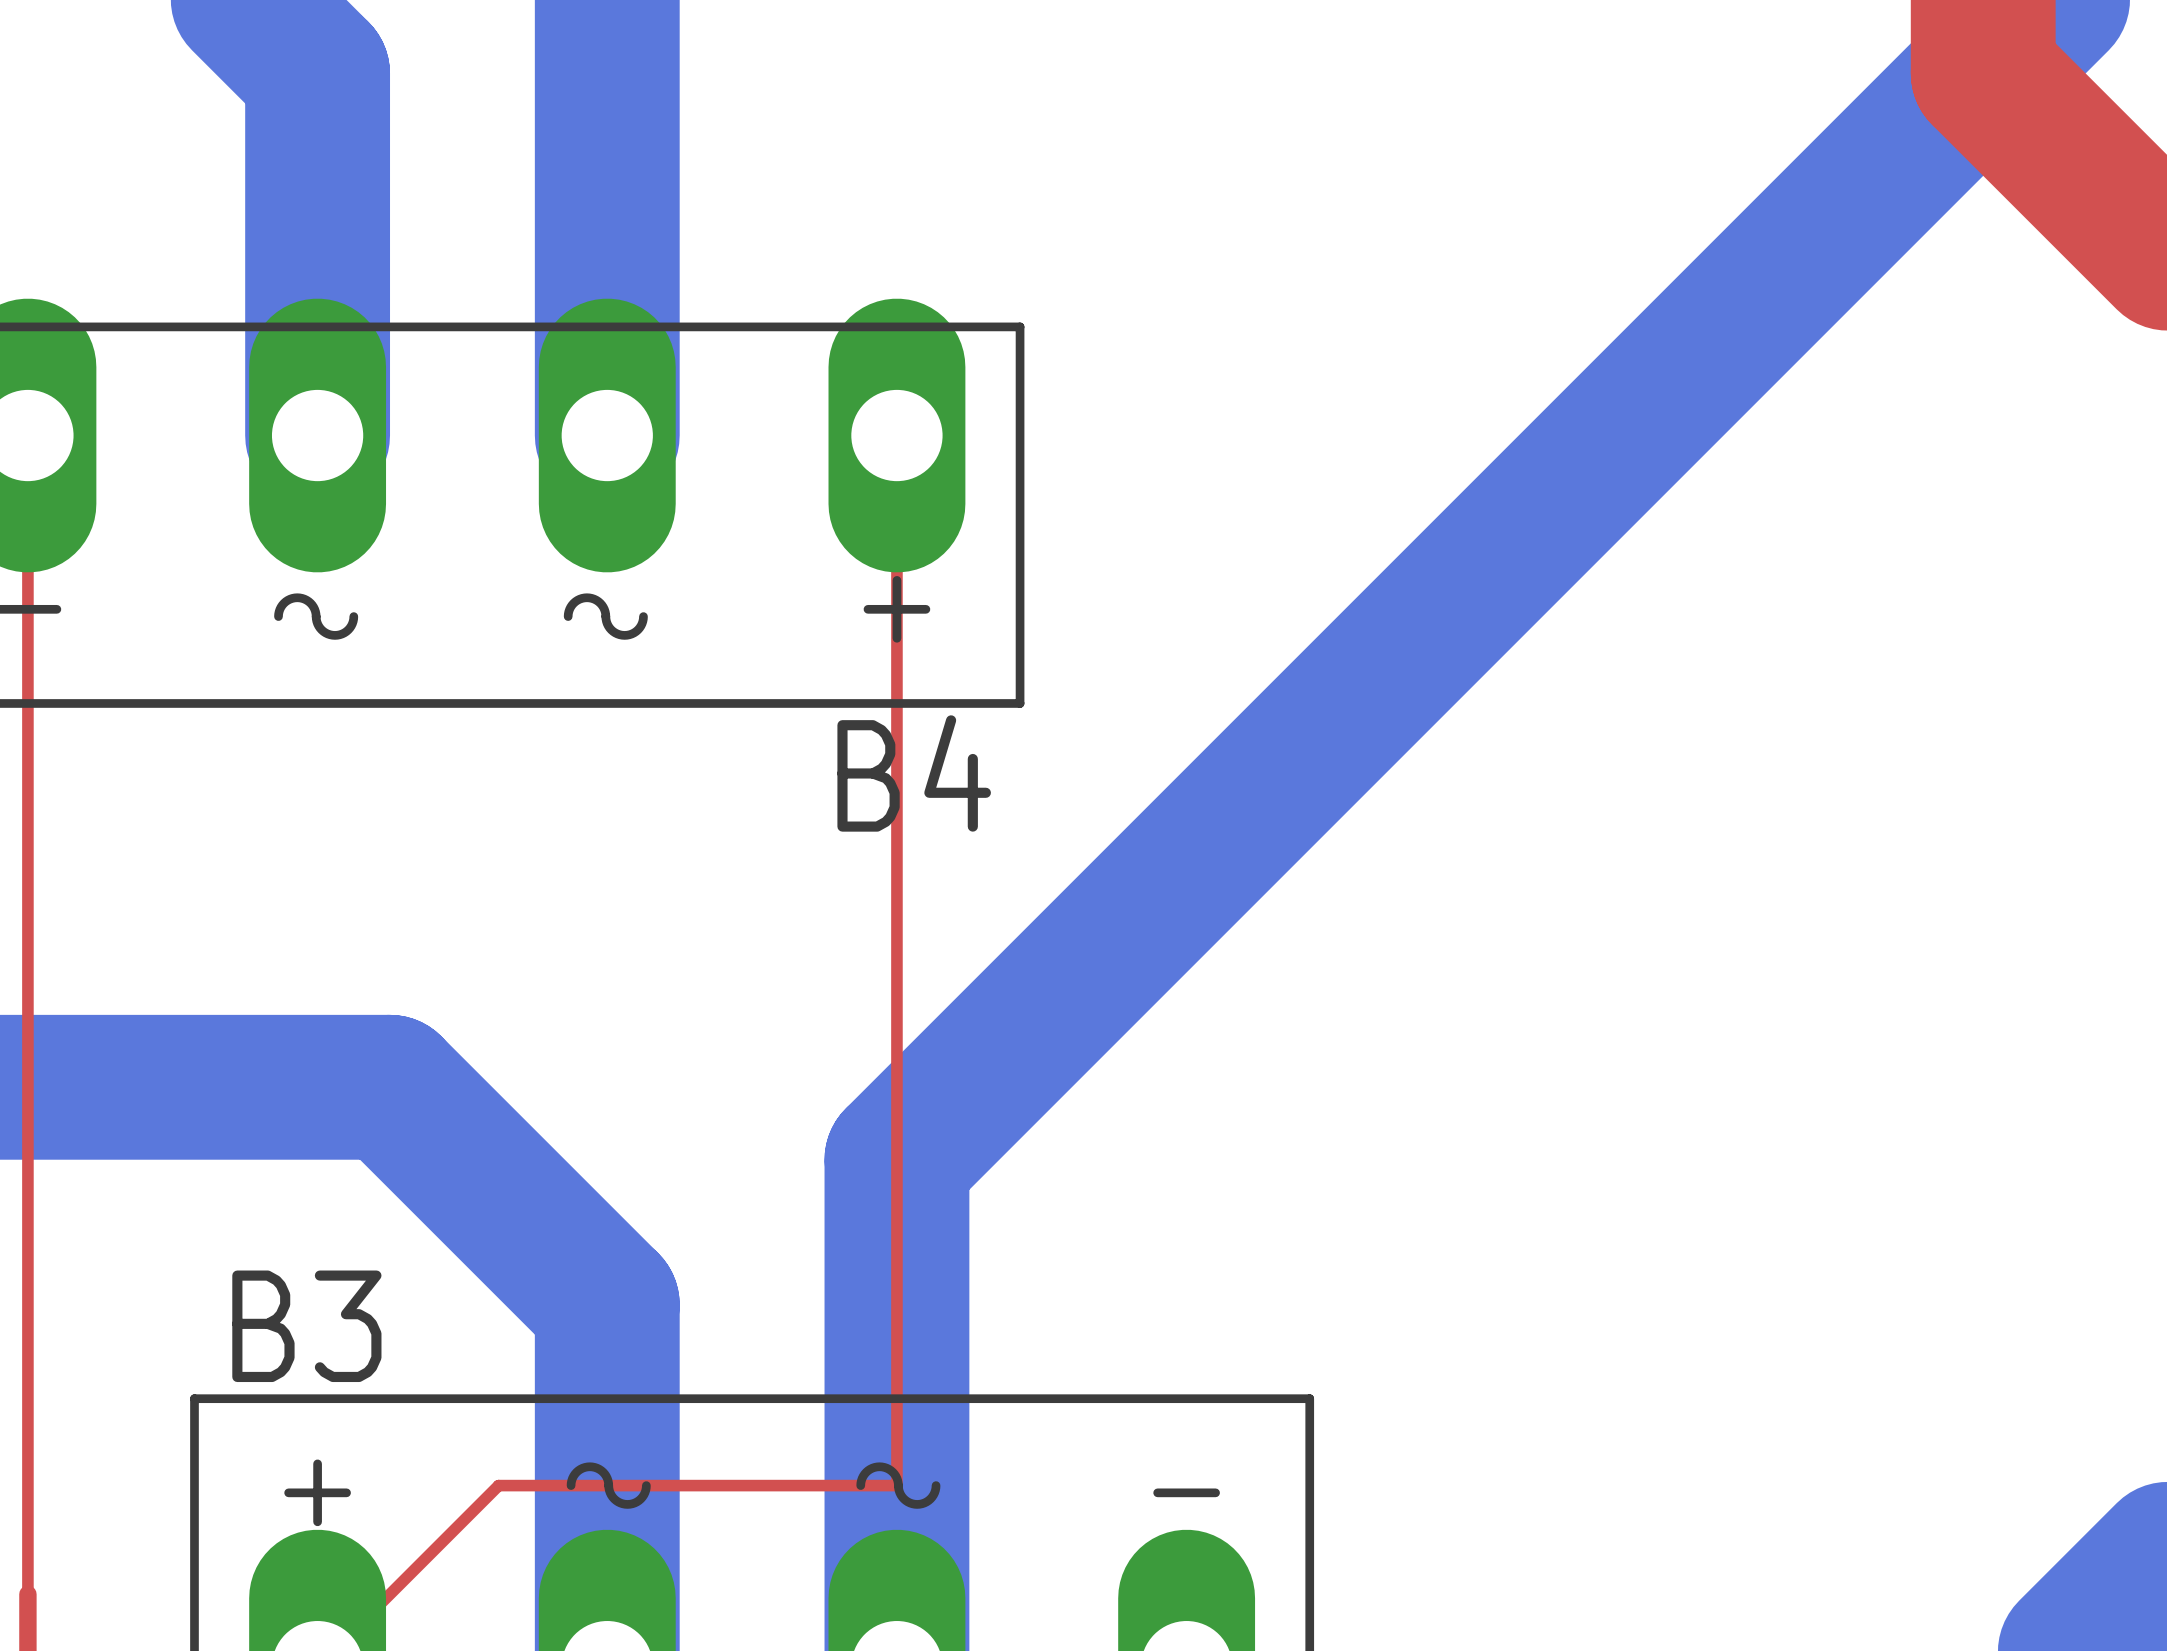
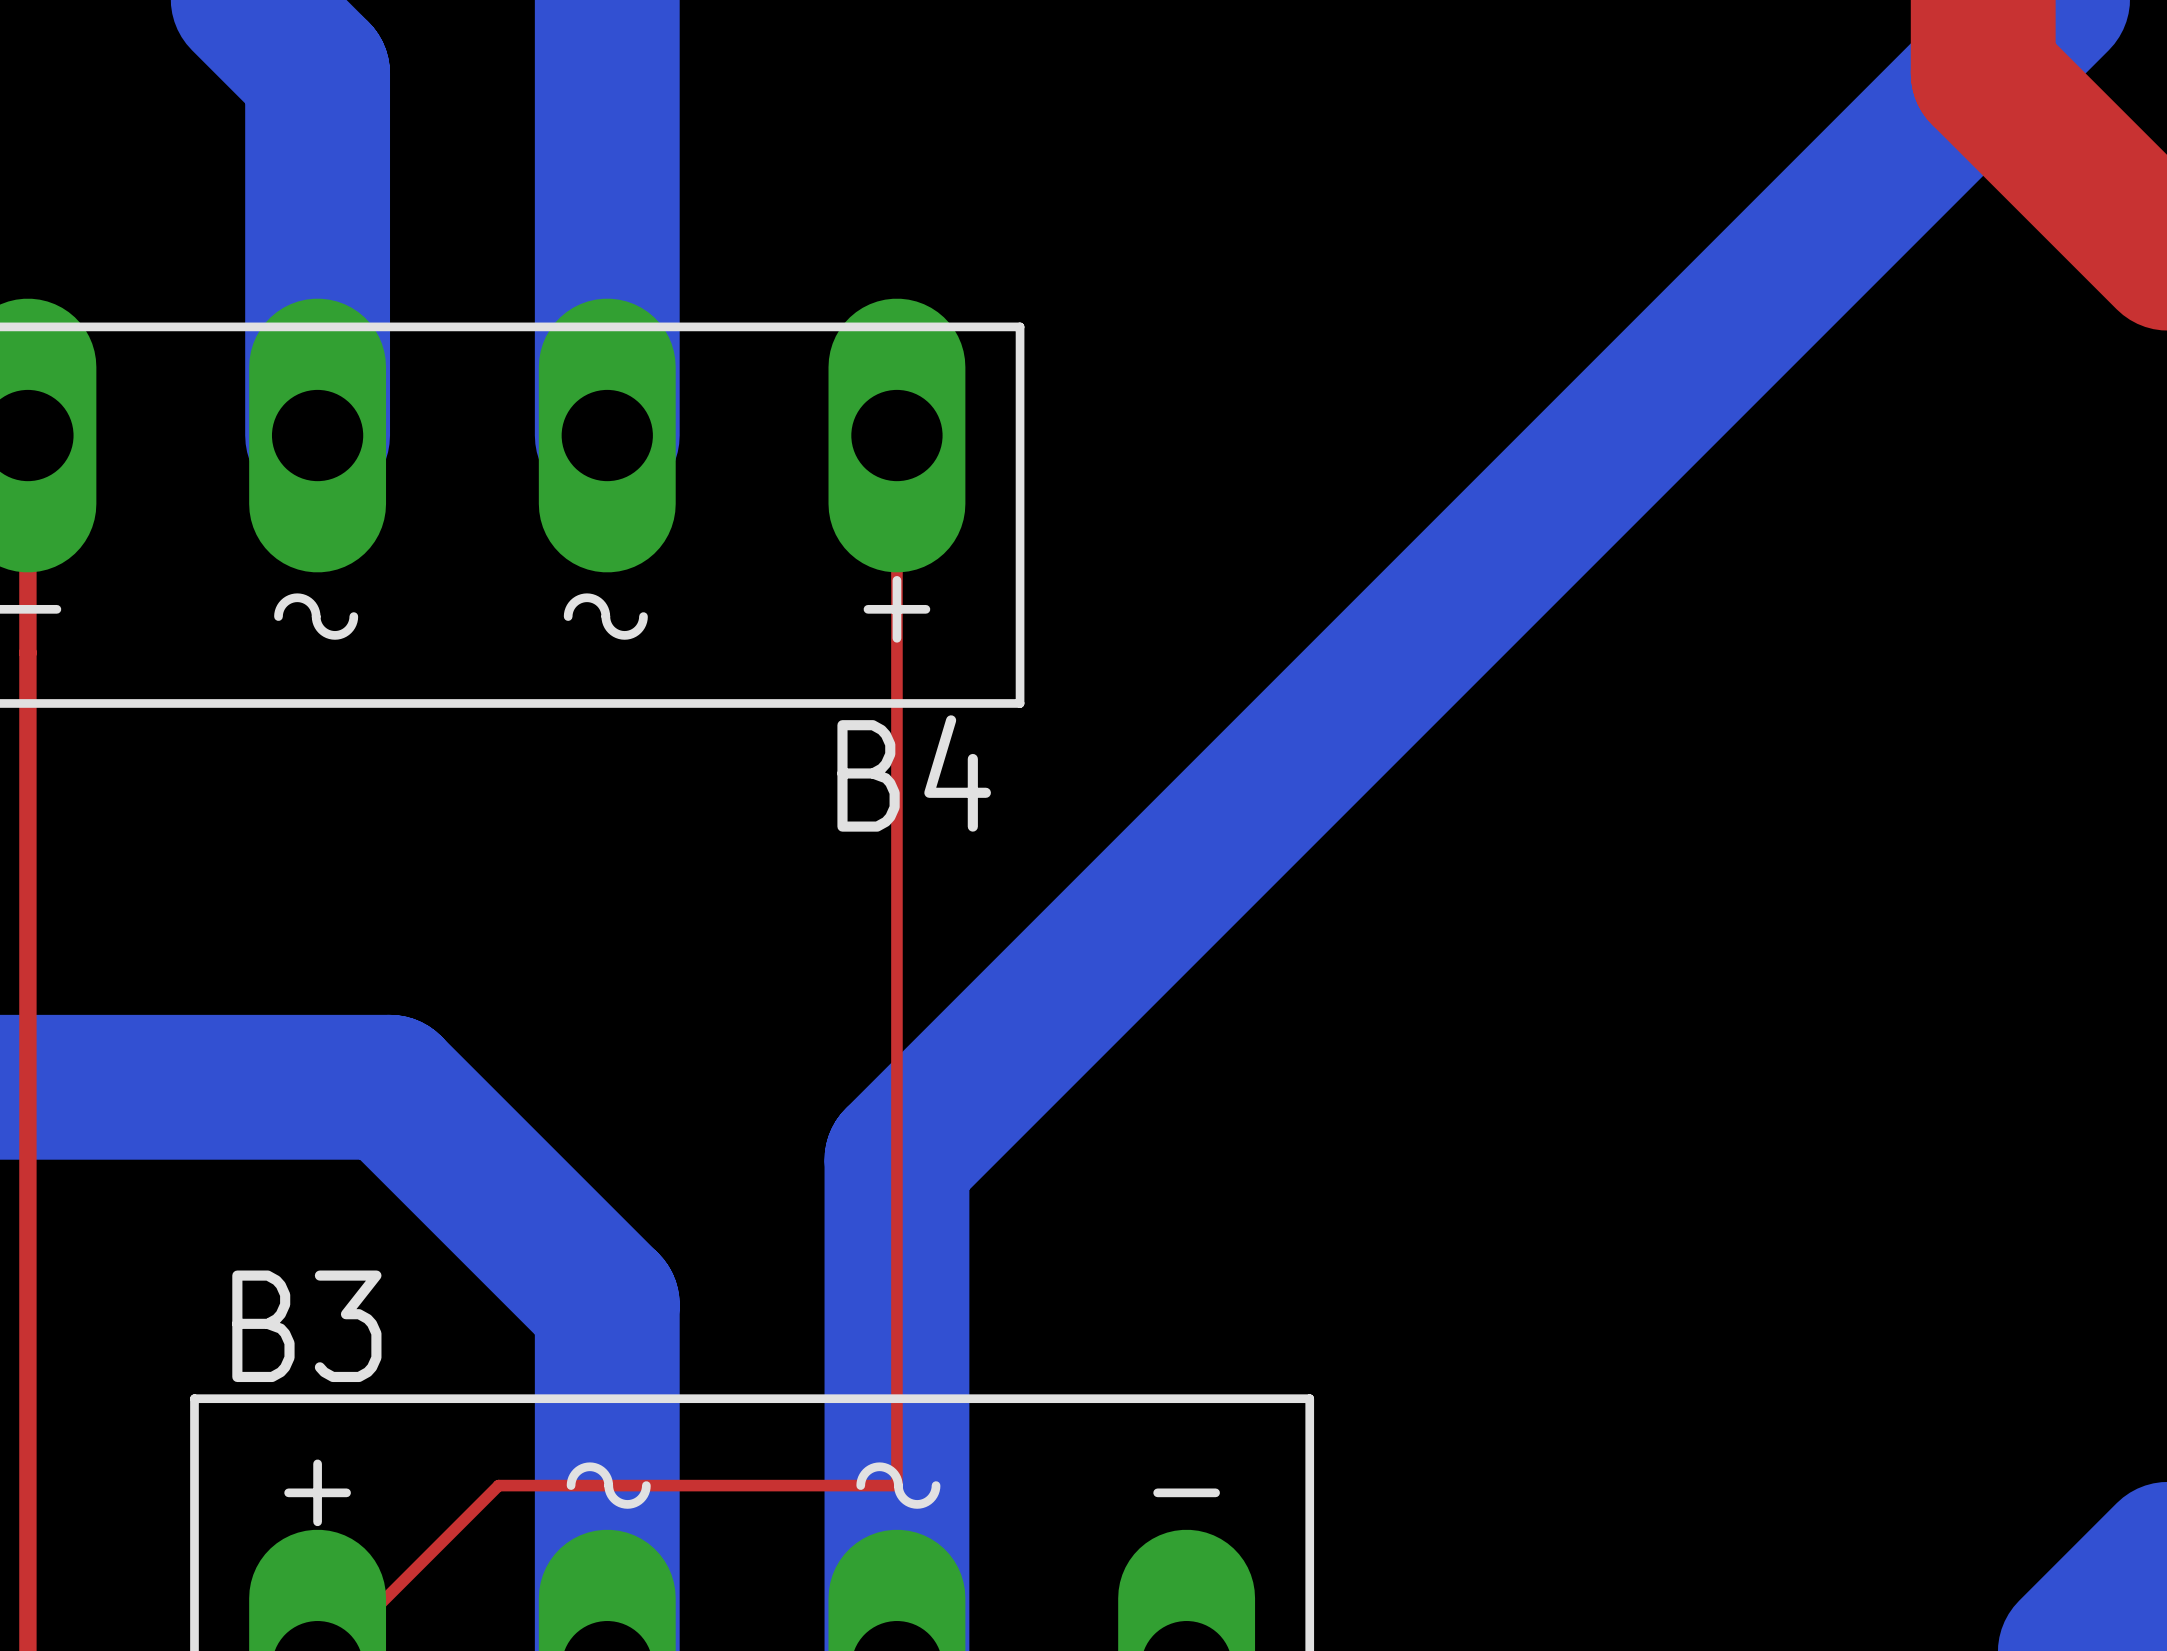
top track width: thin (27, 435) (27, 1594) -> thick (27, 435) (27, 1594)

